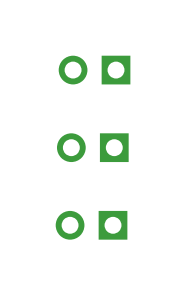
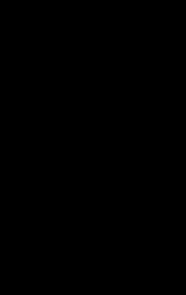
part: (94, 70) -> none
part: (92, 147) -> none
part: (91, 225) -> none

